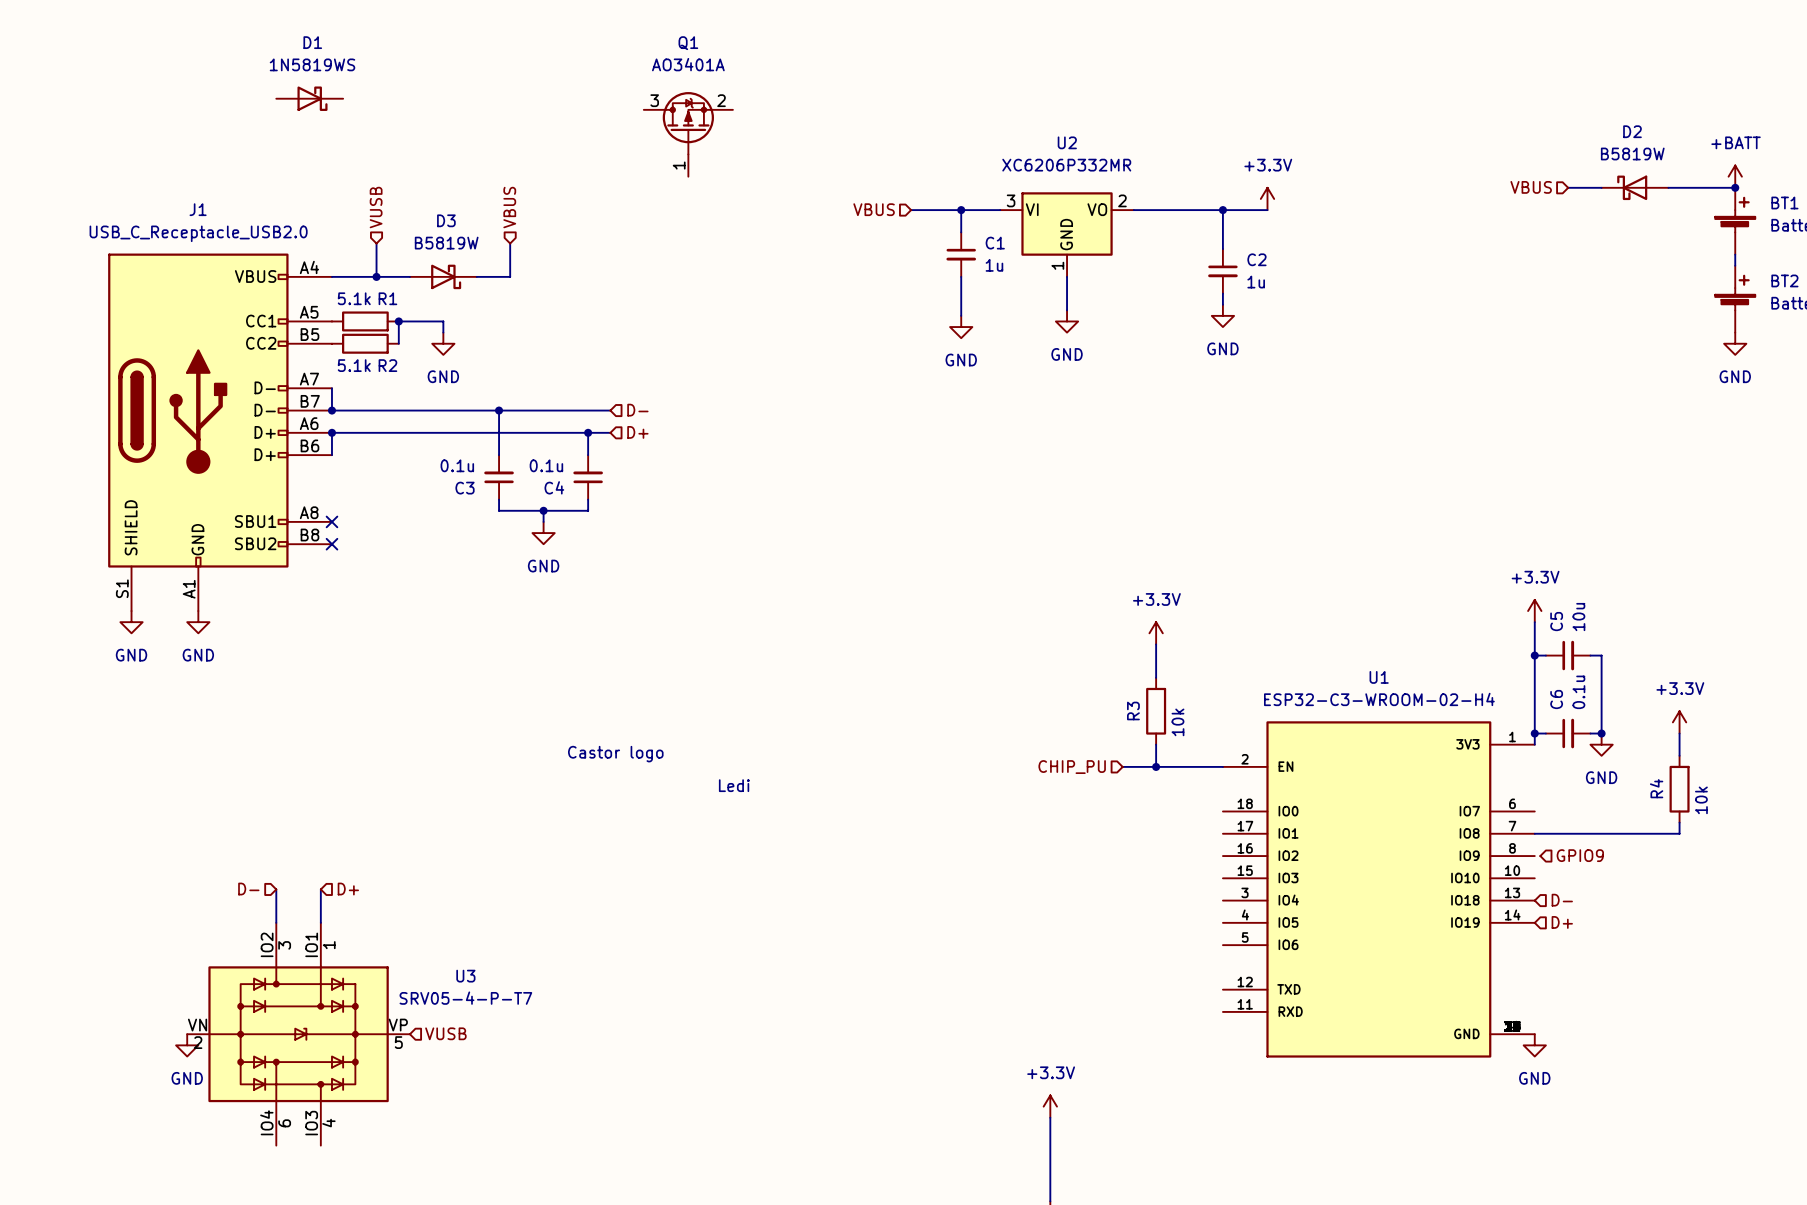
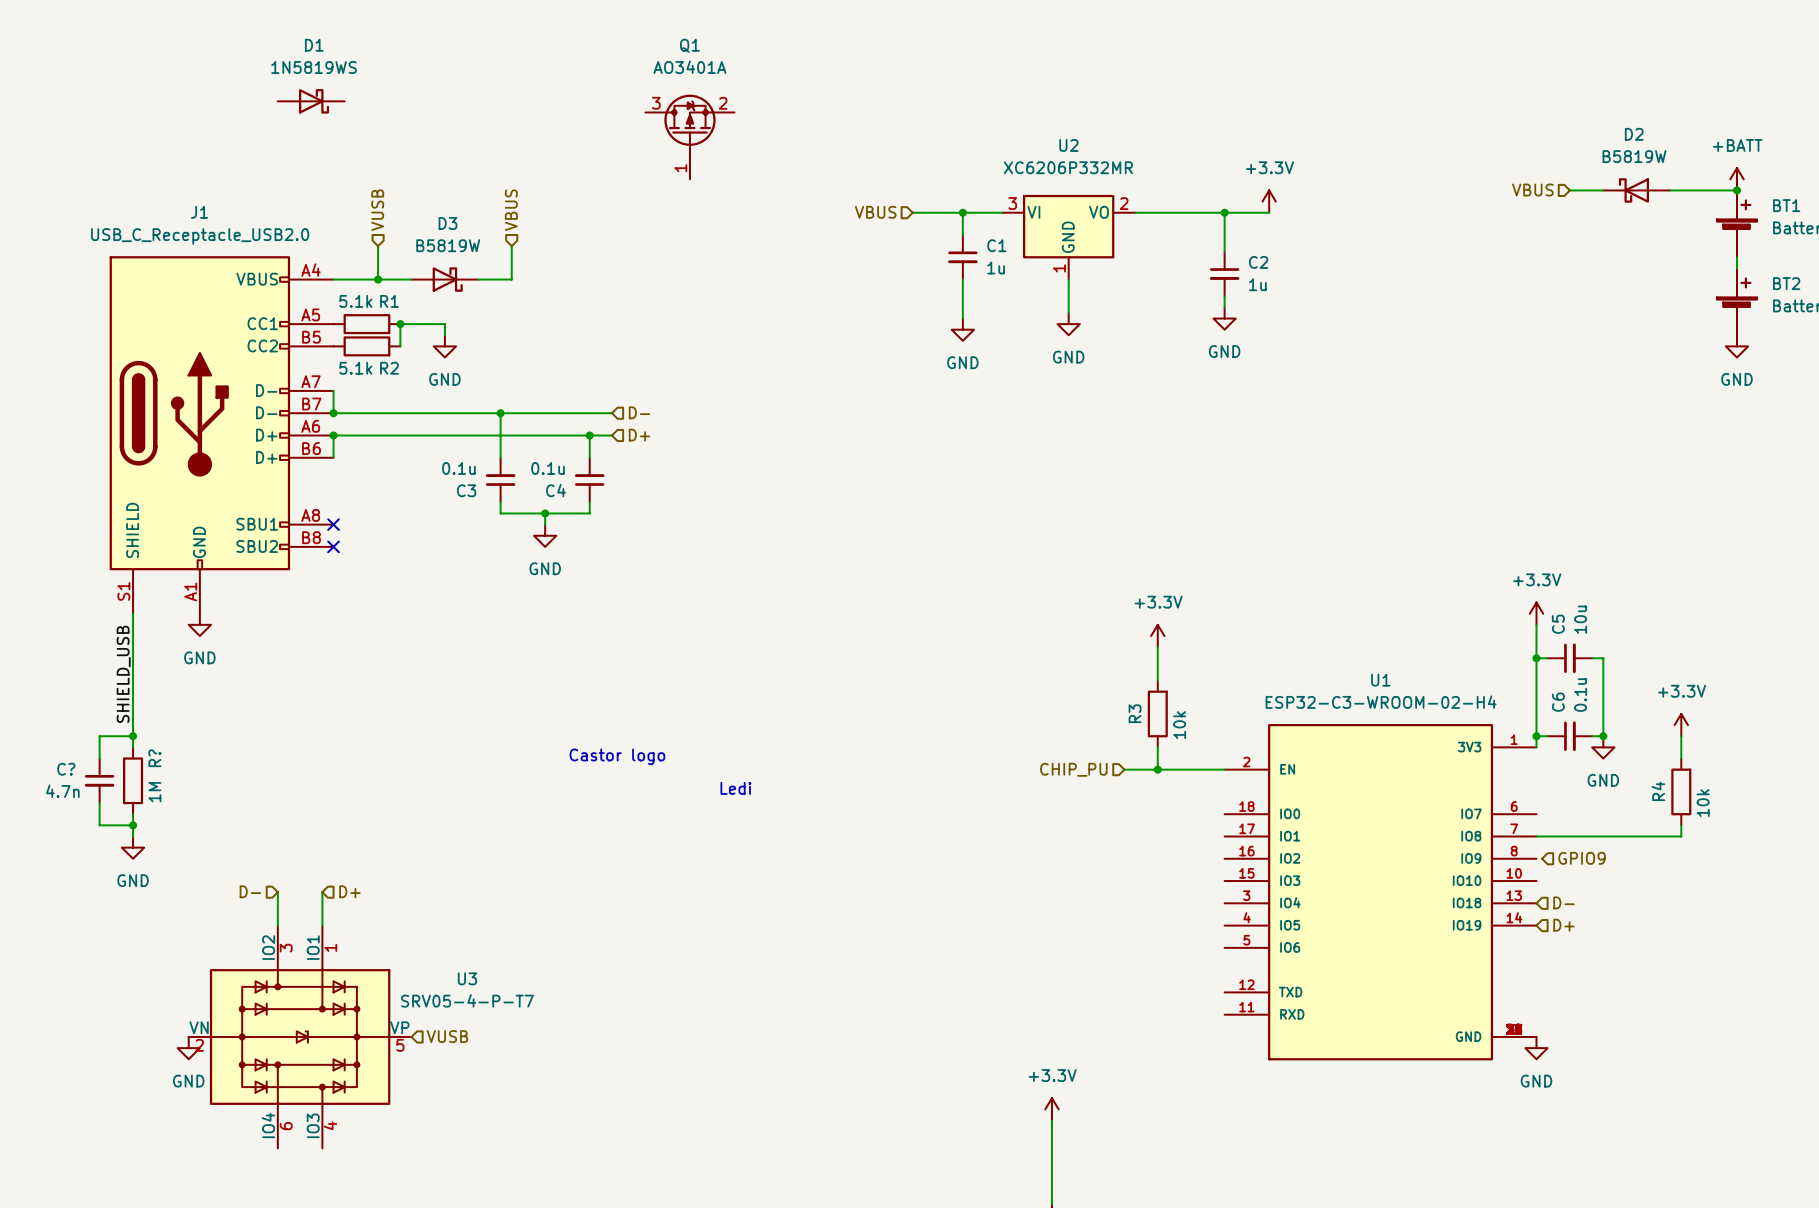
wire: none -> (133, 613) (133, 747)
power symbol: GND (131, 622) -> none
label: none -> SHIELD_USB (123, 674)
wire: none -> (133, 736) (99, 736) (99, 758)
junction: none -> (133, 736)
C?: none -> 4.7n (99, 780)
R?: none -> 1M (133, 780)
wire: none -> (99, 803) (99, 825) (133, 825)
wire: none -> (133, 814) (133, 836)
junction: none -> (133, 825)
power symbol: none -> GND (133, 847)

